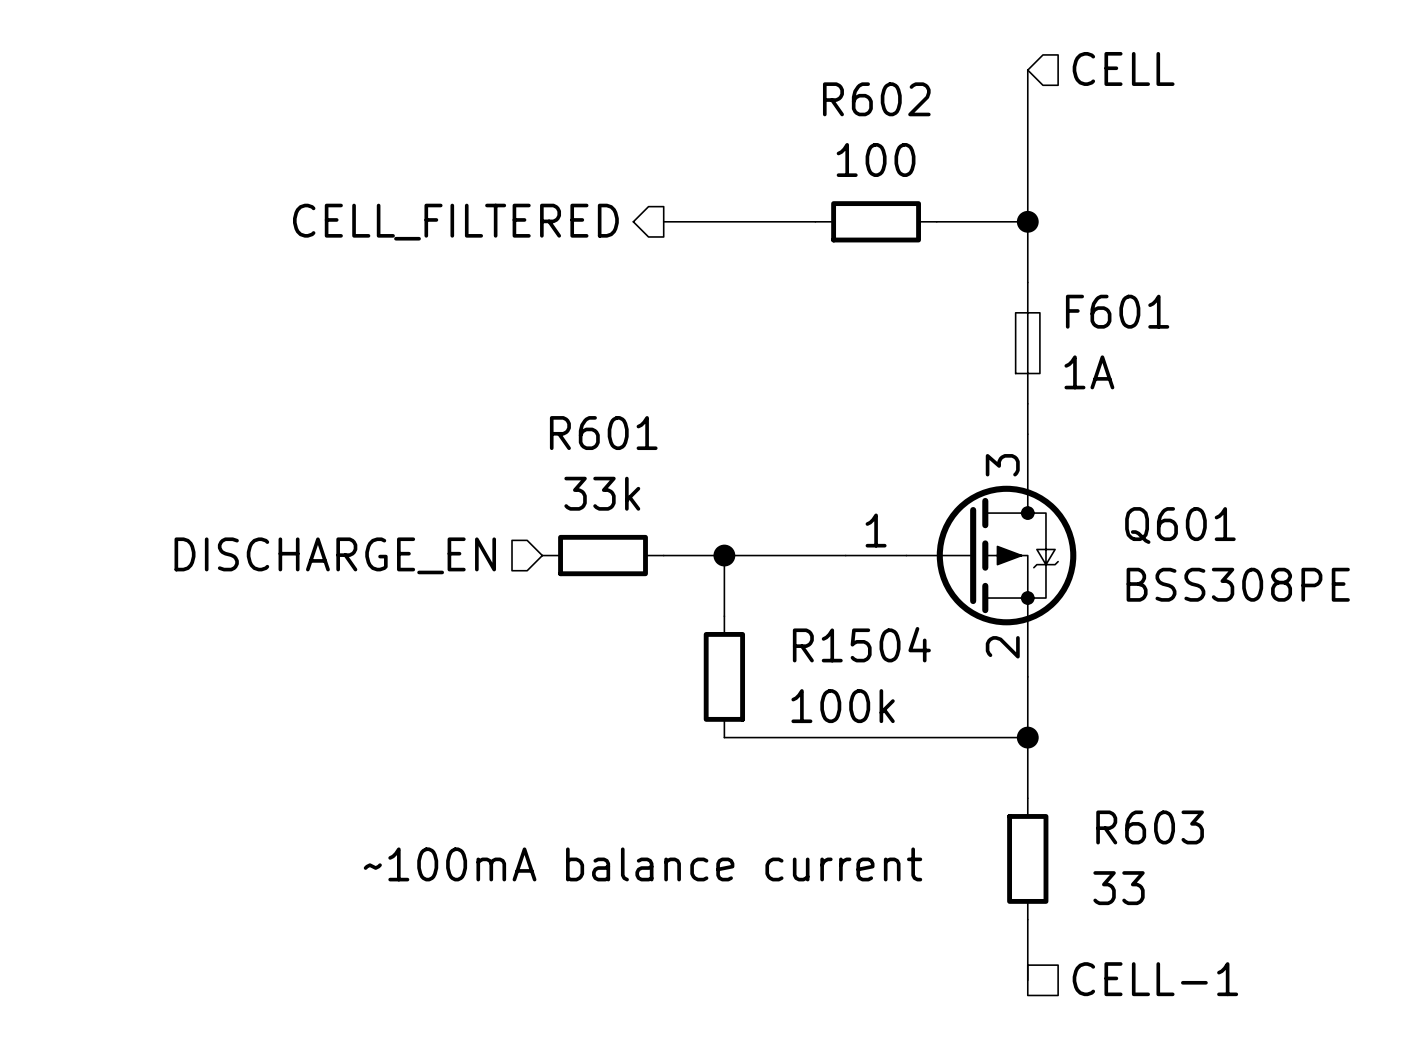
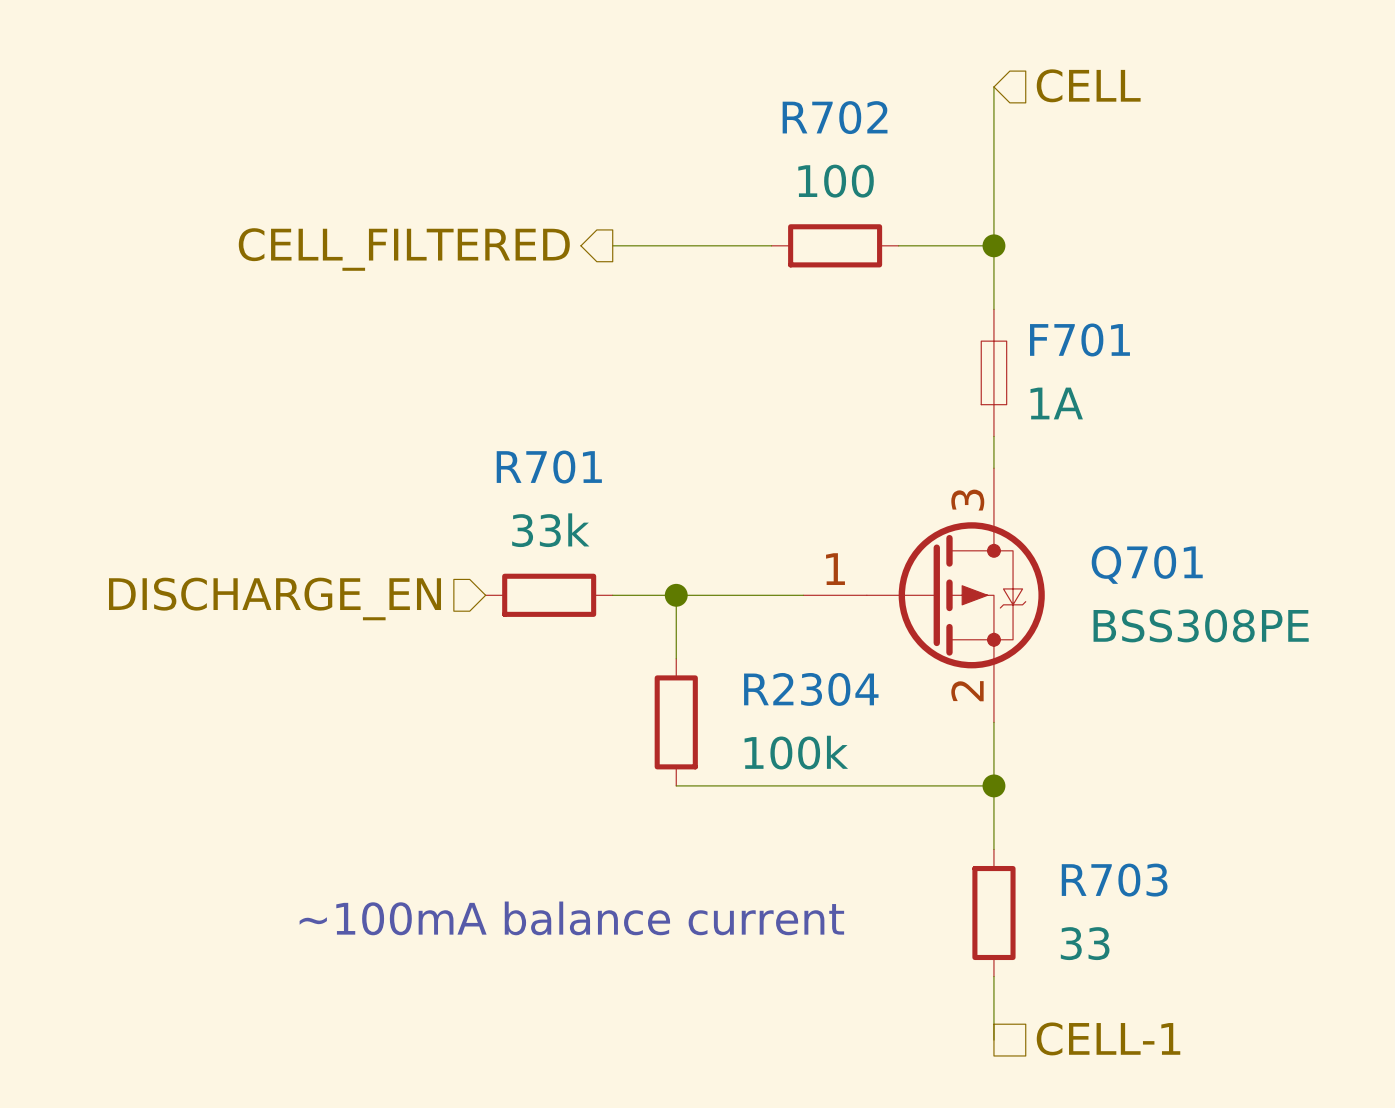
R602 name: R602 (876, 99) -> R702 (835, 117)
F601 name: F601 (1117, 311) -> F701 (1079, 339)
R601 name: R601 (603, 433) -> R701 (549, 467)
Q601 name: Q601 (1180, 525) -> Q701 (1147, 564)
R1504 name: R1504 (861, 644) -> R2304 (811, 689)
R603 name: R603 (1150, 827) -> R703 (1114, 880)

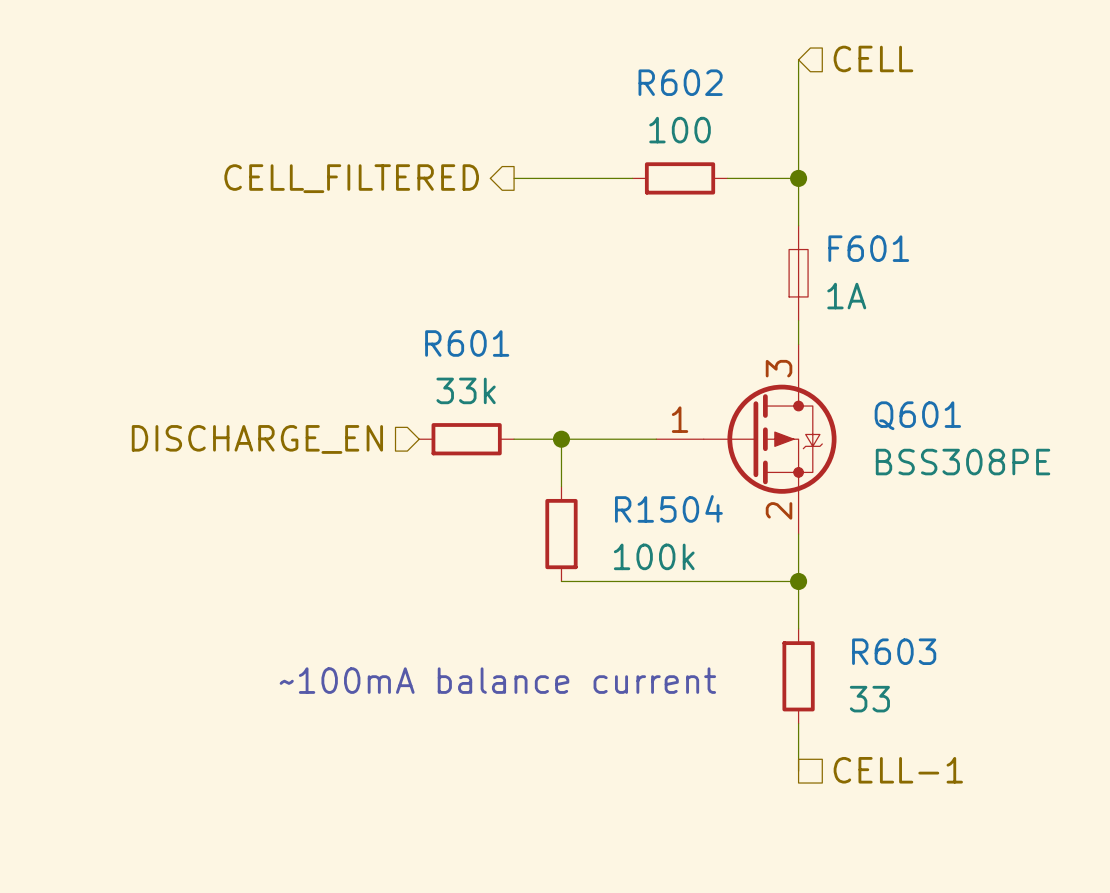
R702 name: R702 (835, 117) -> R602 (680, 82)
F701 name: F701 (1079, 339) -> F601 (868, 248)
R701 name: R701 (549, 467) -> R601 (467, 343)
Q701 name: Q701 (1147, 564) -> Q601 (917, 415)
R2304 name: R2304 (811, 689) -> R1504 (668, 508)
R703 name: R703 (1114, 880) -> R603 (894, 651)

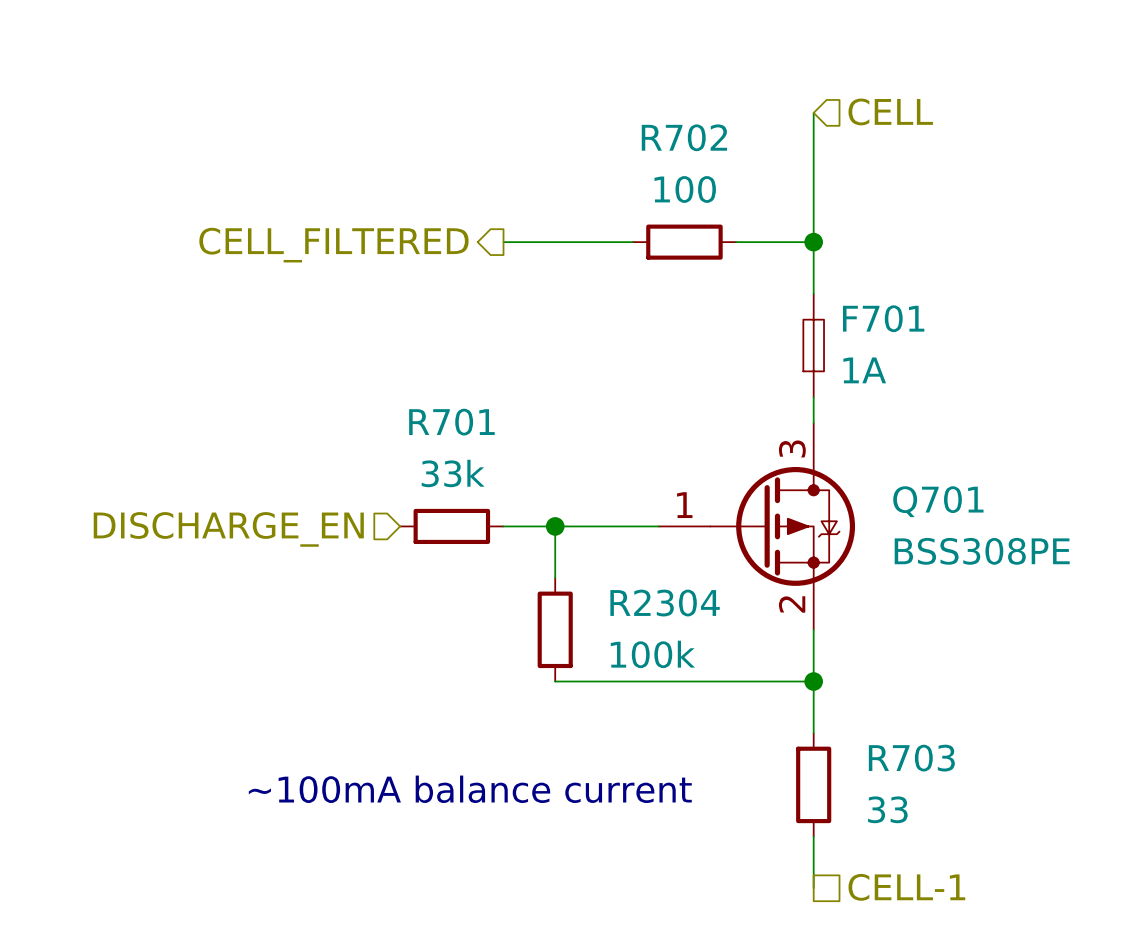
R602 name: R602 (680, 82) -> R702 (684, 137)
F601 name: F601 (868, 248) -> F701 (883, 318)
R601 name: R601 (467, 343) -> R701 (451, 422)
Q601 name: Q601 (917, 415) -> Q701 (938, 501)
R1504 name: R1504 (668, 508) -> R2304 (665, 603)
R603 name: R603 (894, 651) -> R703 (911, 758)

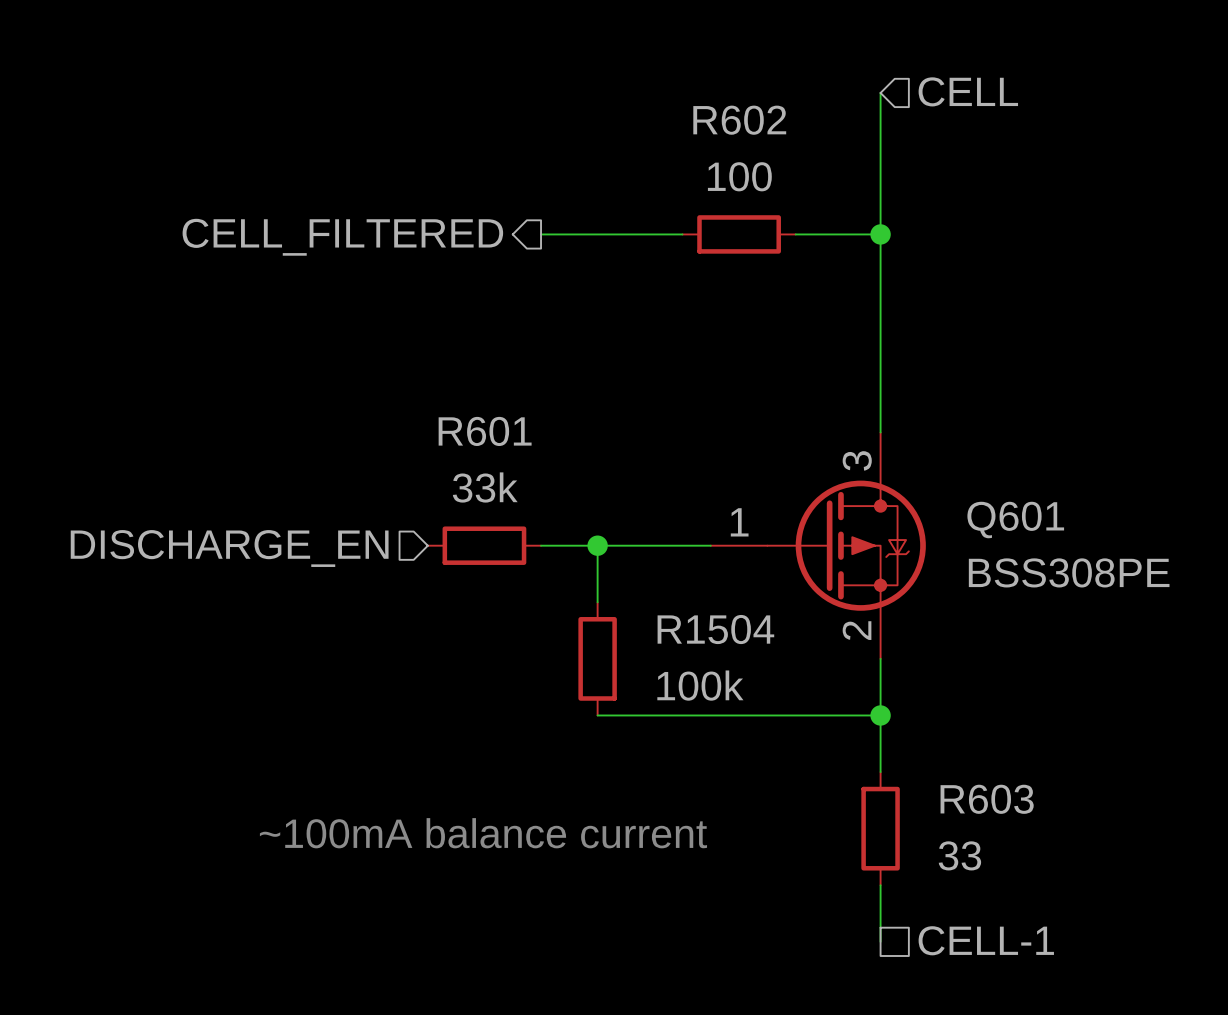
R702 name: R702 (684, 137) -> R602 (739, 120)
F701: 1A (813, 345) -> none
R701 name: R701 (451, 422) -> R601 (485, 431)
Q701 name: Q701 (938, 501) -> Q601 (1015, 520)
R2304 name: R2304 (665, 603) -> R1504 (715, 629)
R703 name: R703 (911, 758) -> R603 (987, 799)

